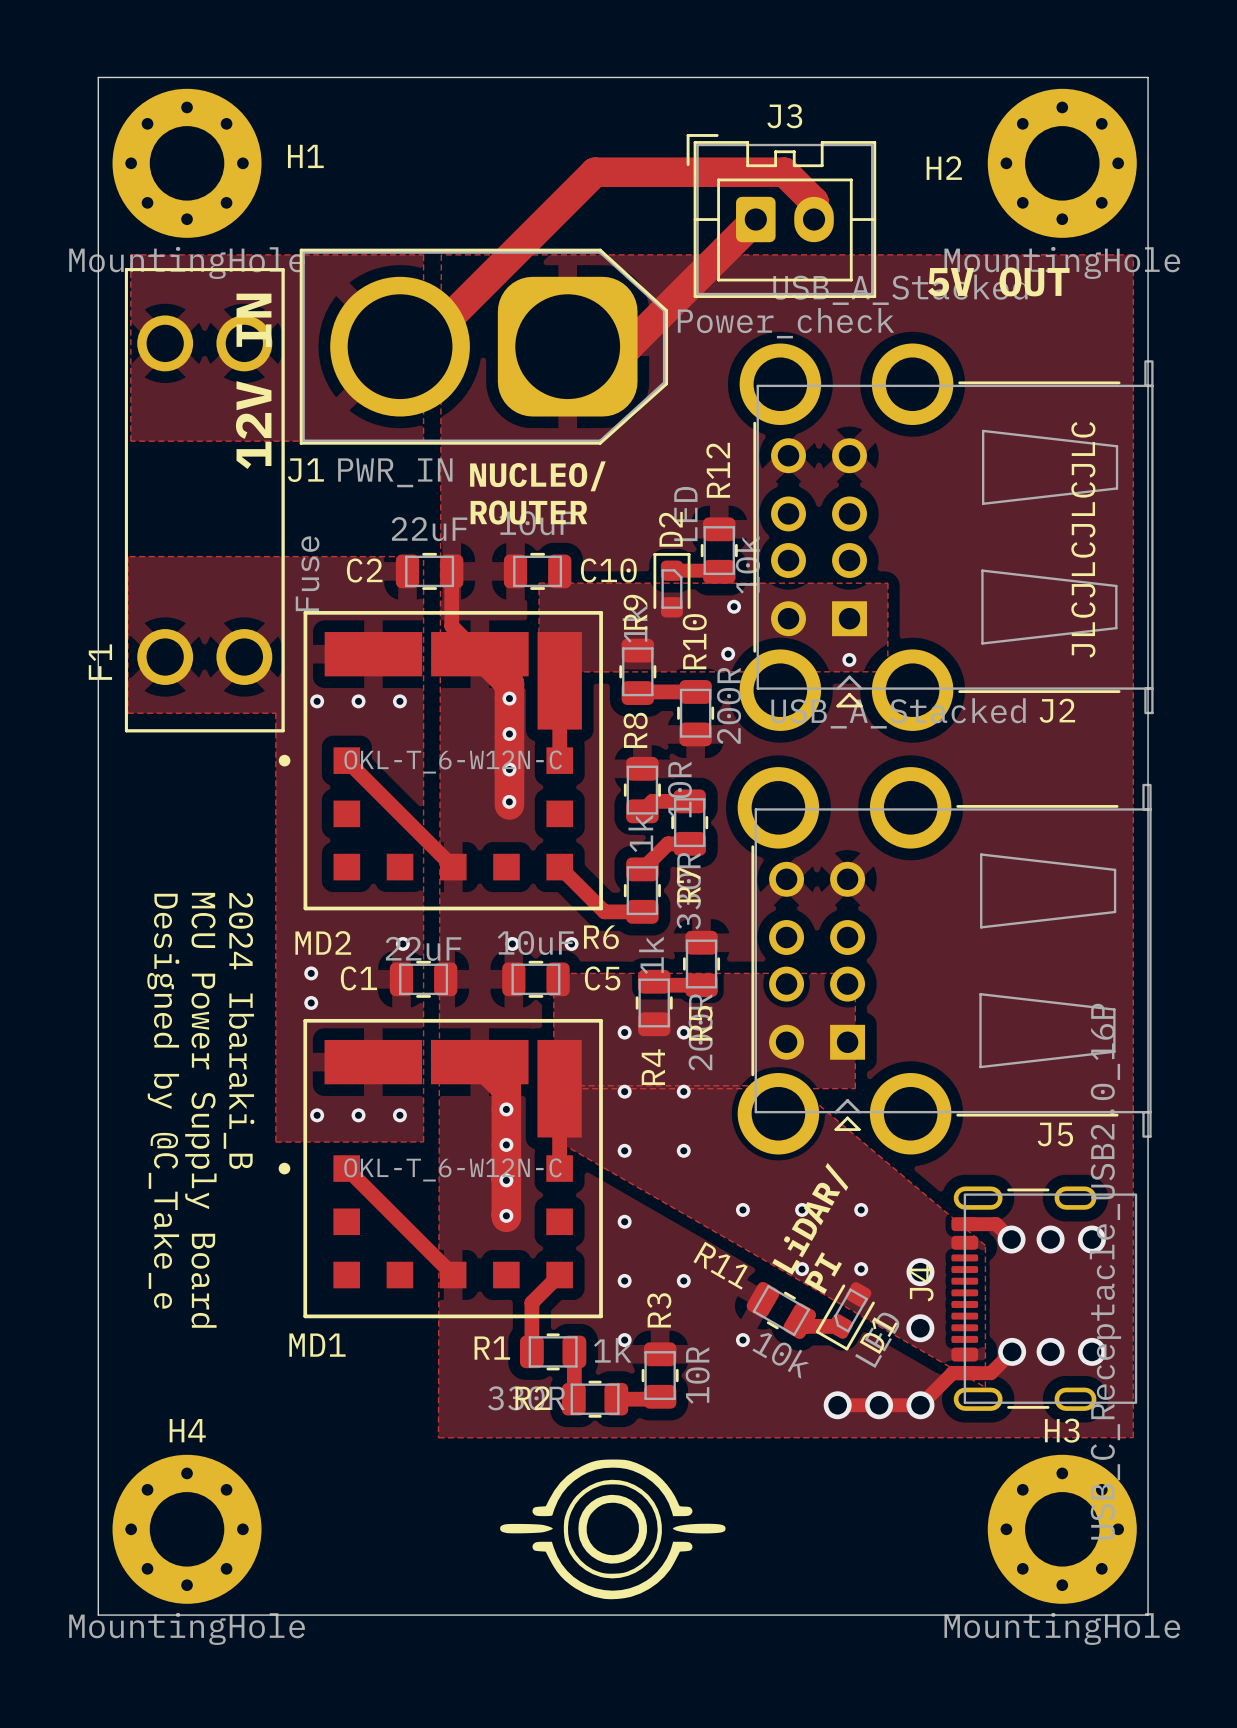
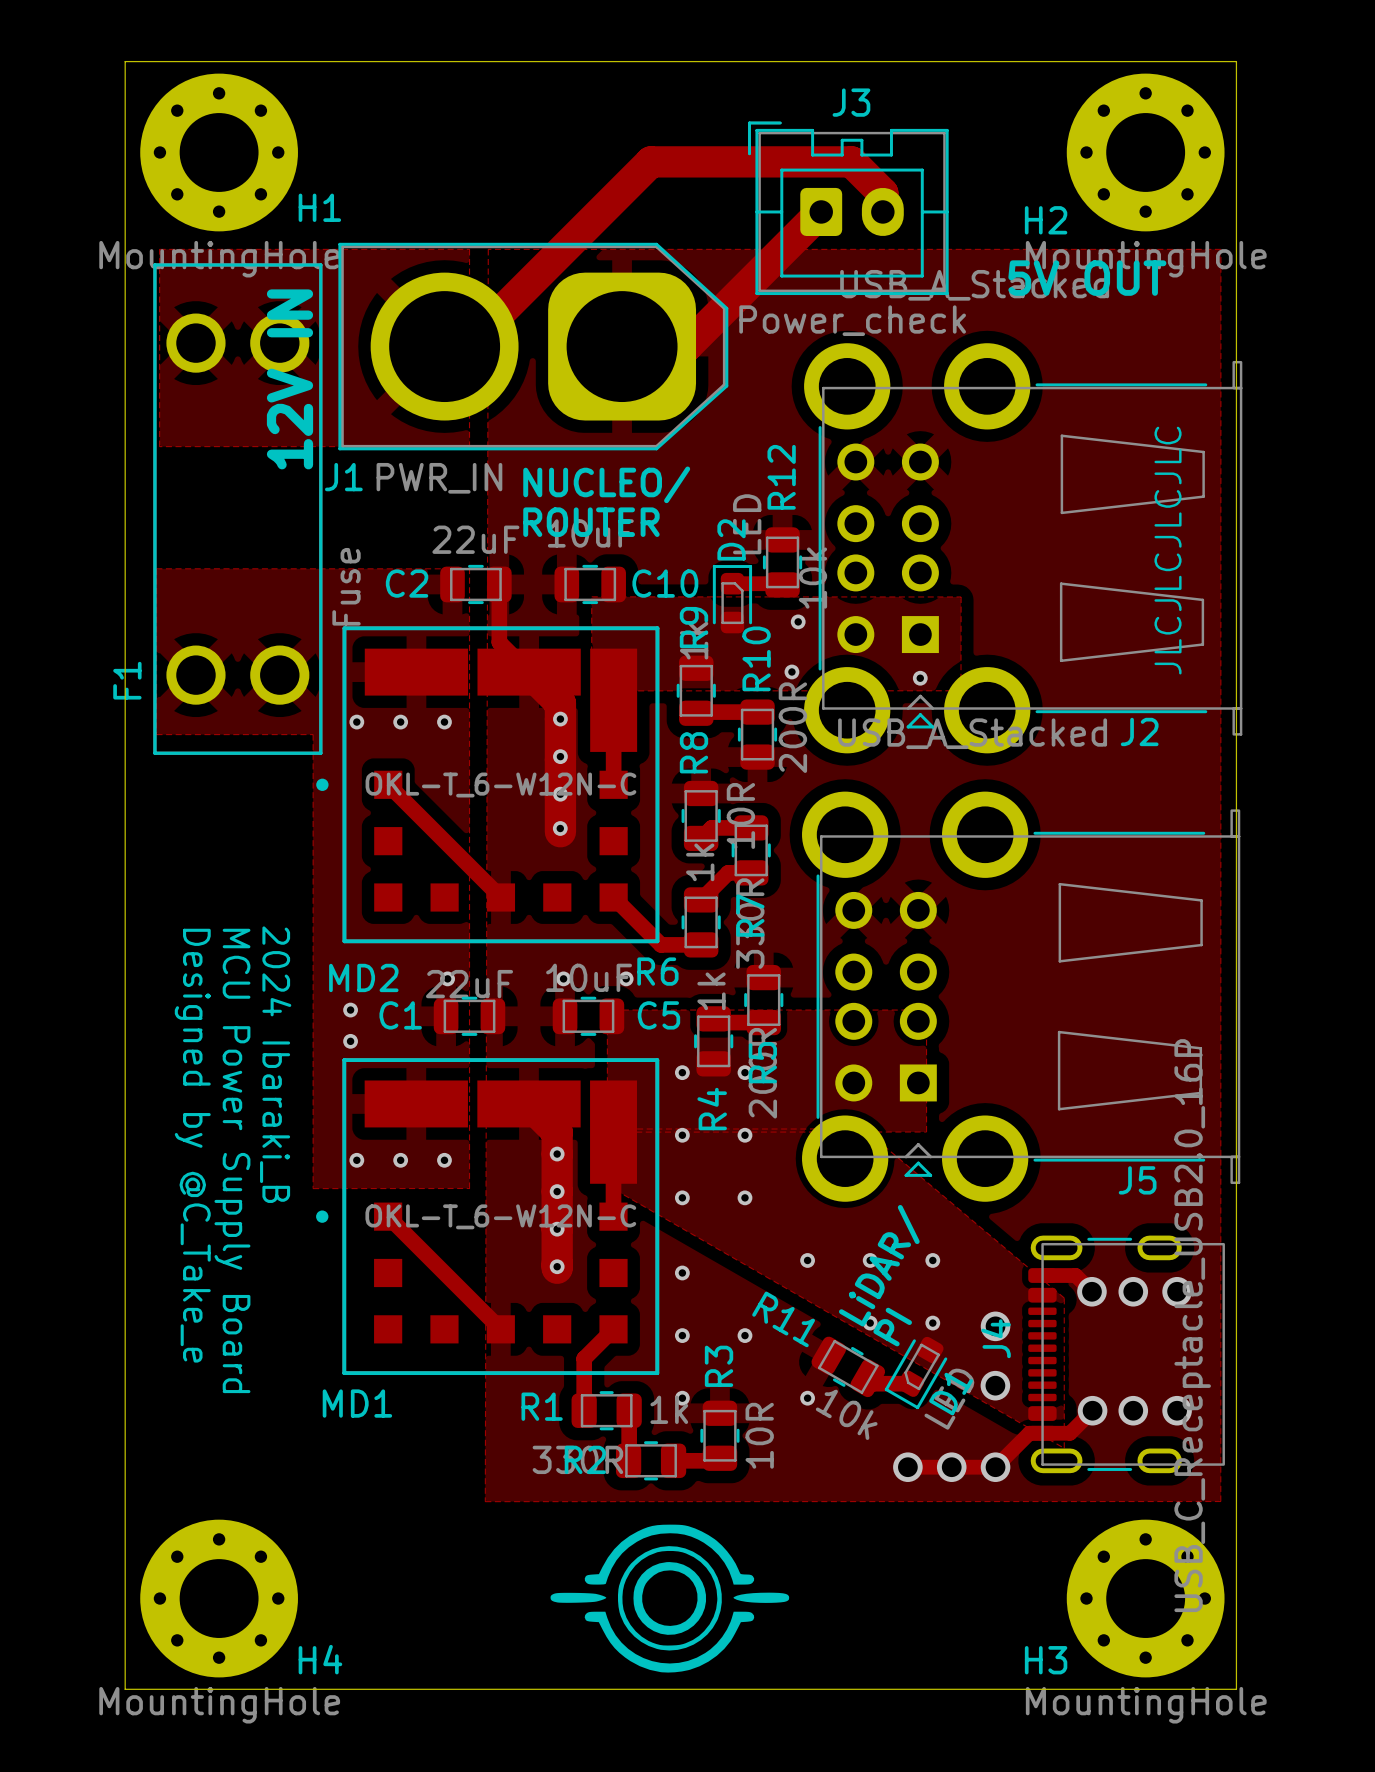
H1 name position: H1 (305, 156) -> H1 (319, 207)
H2 name position: H2 (944, 168) -> H2 (1046, 220)
H4 name position: H4 (187, 1430) -> H4 (320, 1659)
H3 name position: H3 (1062, 1430) -> H3 (1046, 1660)

